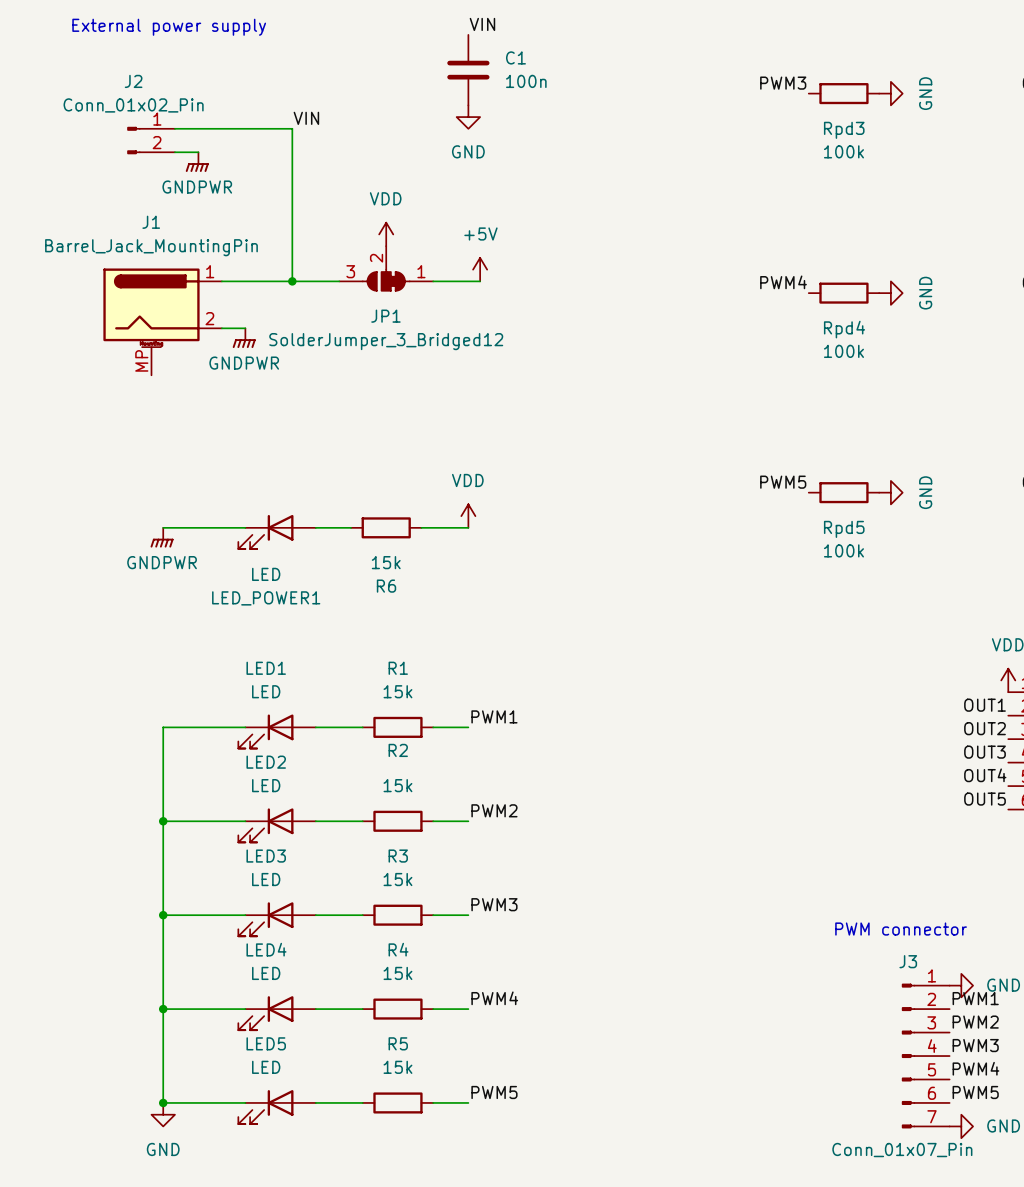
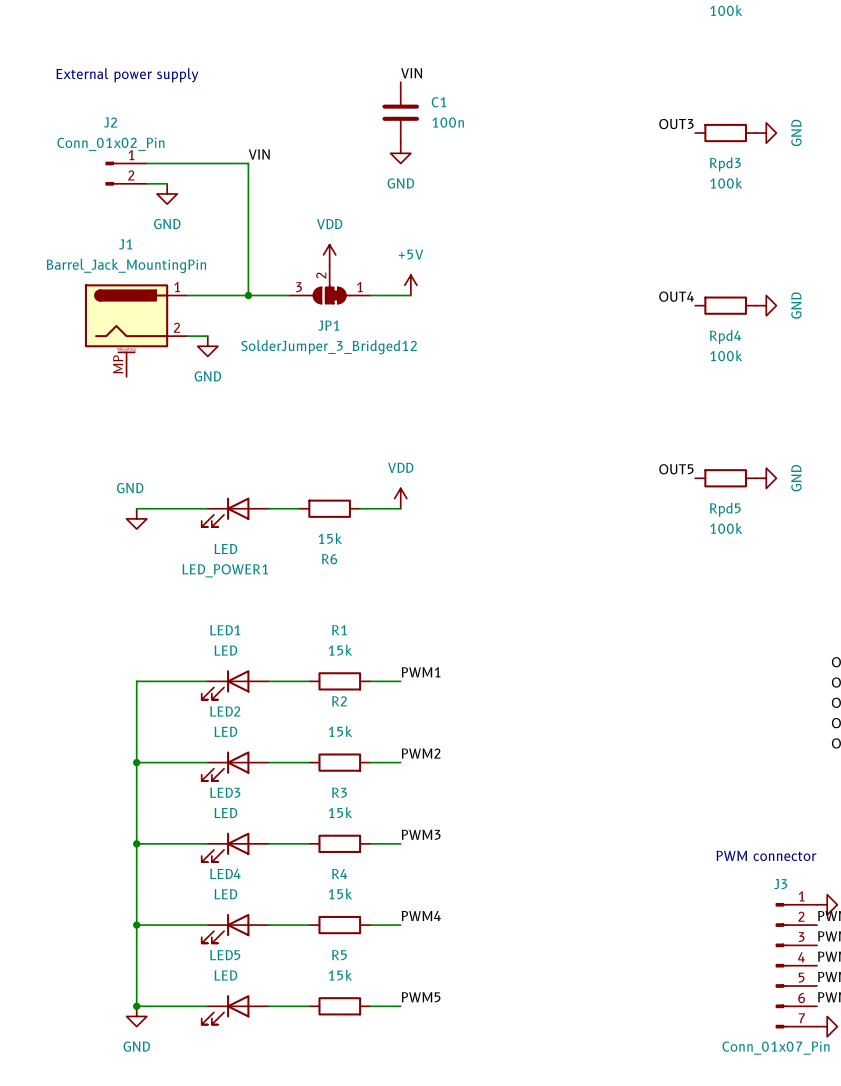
label: PWM3 (783, 83) -> OUT3 (676, 124)
power symbol: GNDPWR (197, 162) -> GND (167, 193)
label: PWM4 (783, 282) -> OUT4 (676, 296)
power symbol: GNDPWR (244, 338) -> GND (207, 346)
label: PWM5 (783, 482) -> OUT5 (676, 469)
power symbol: GNDPWR (162, 537) -> GND (136, 518)

